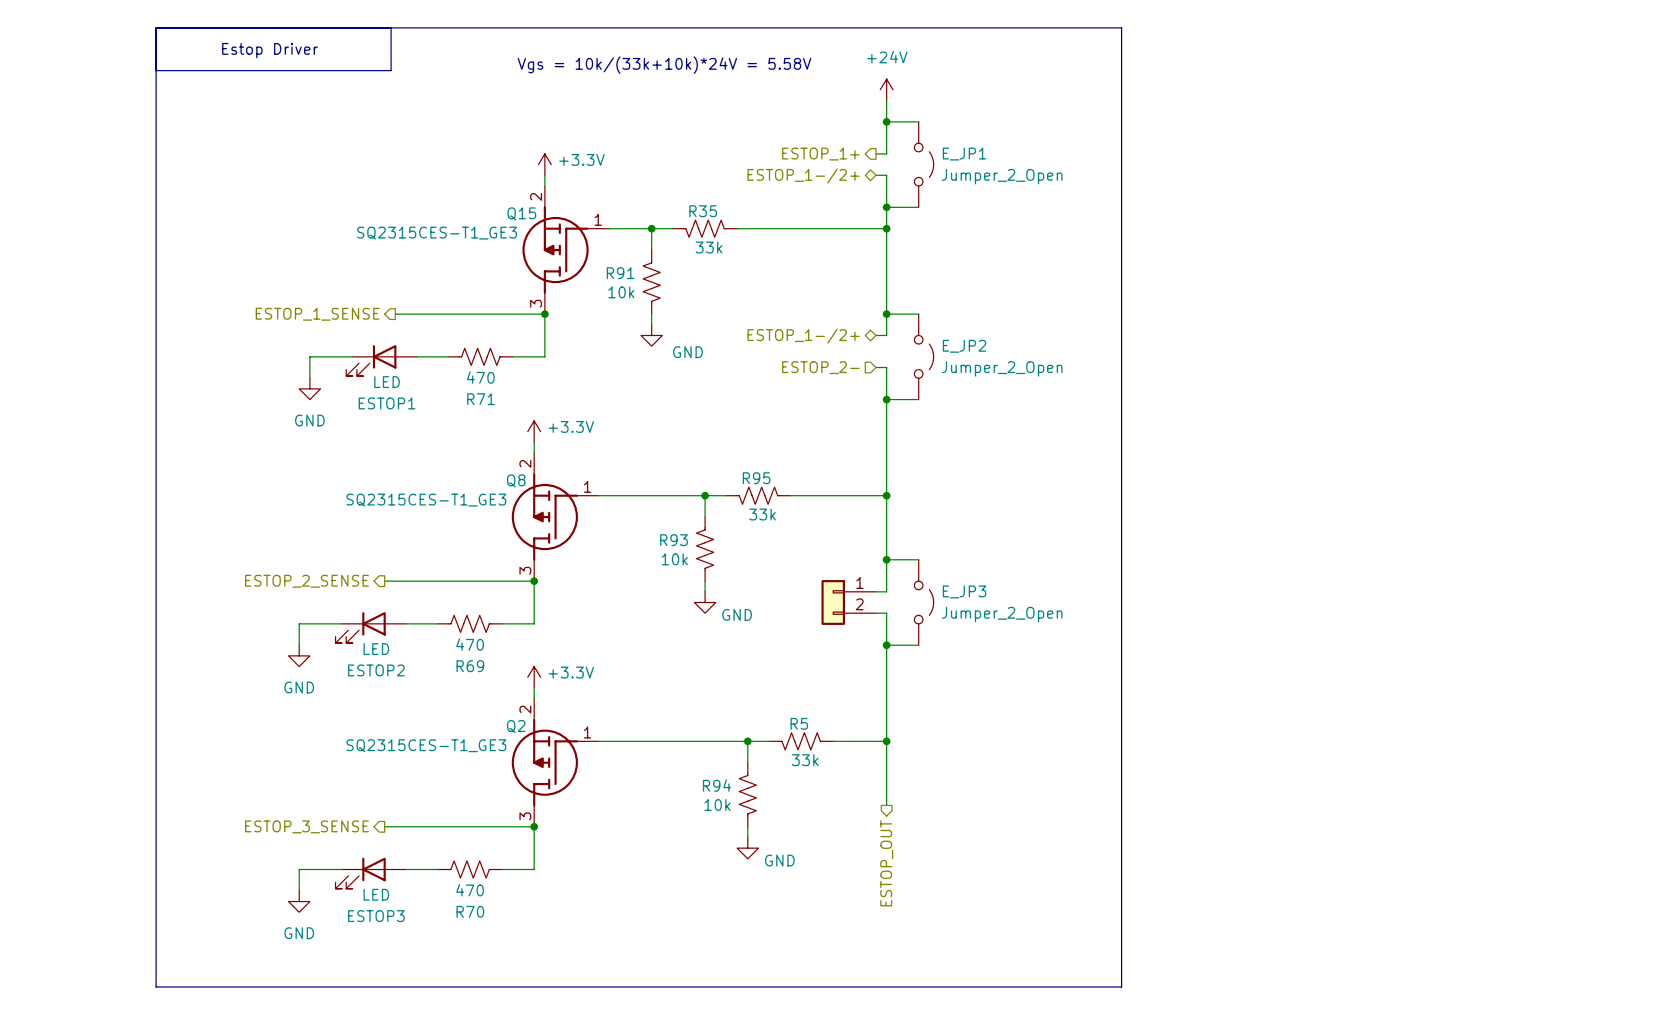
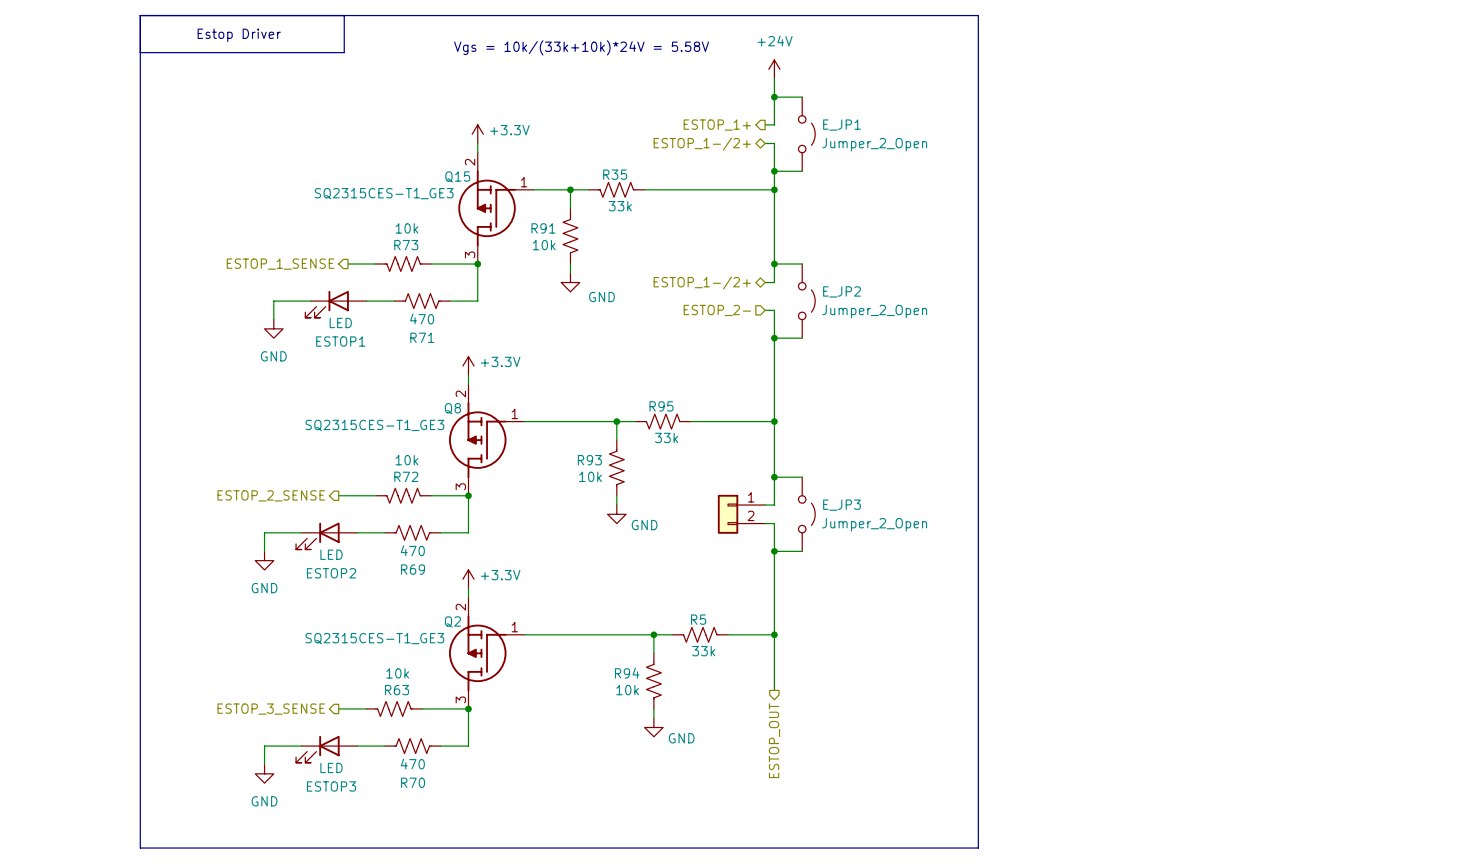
R73: none -> 10k (403, 264)
R72: none -> 10k (403, 495)
R63: none -> 10k (394, 708)

